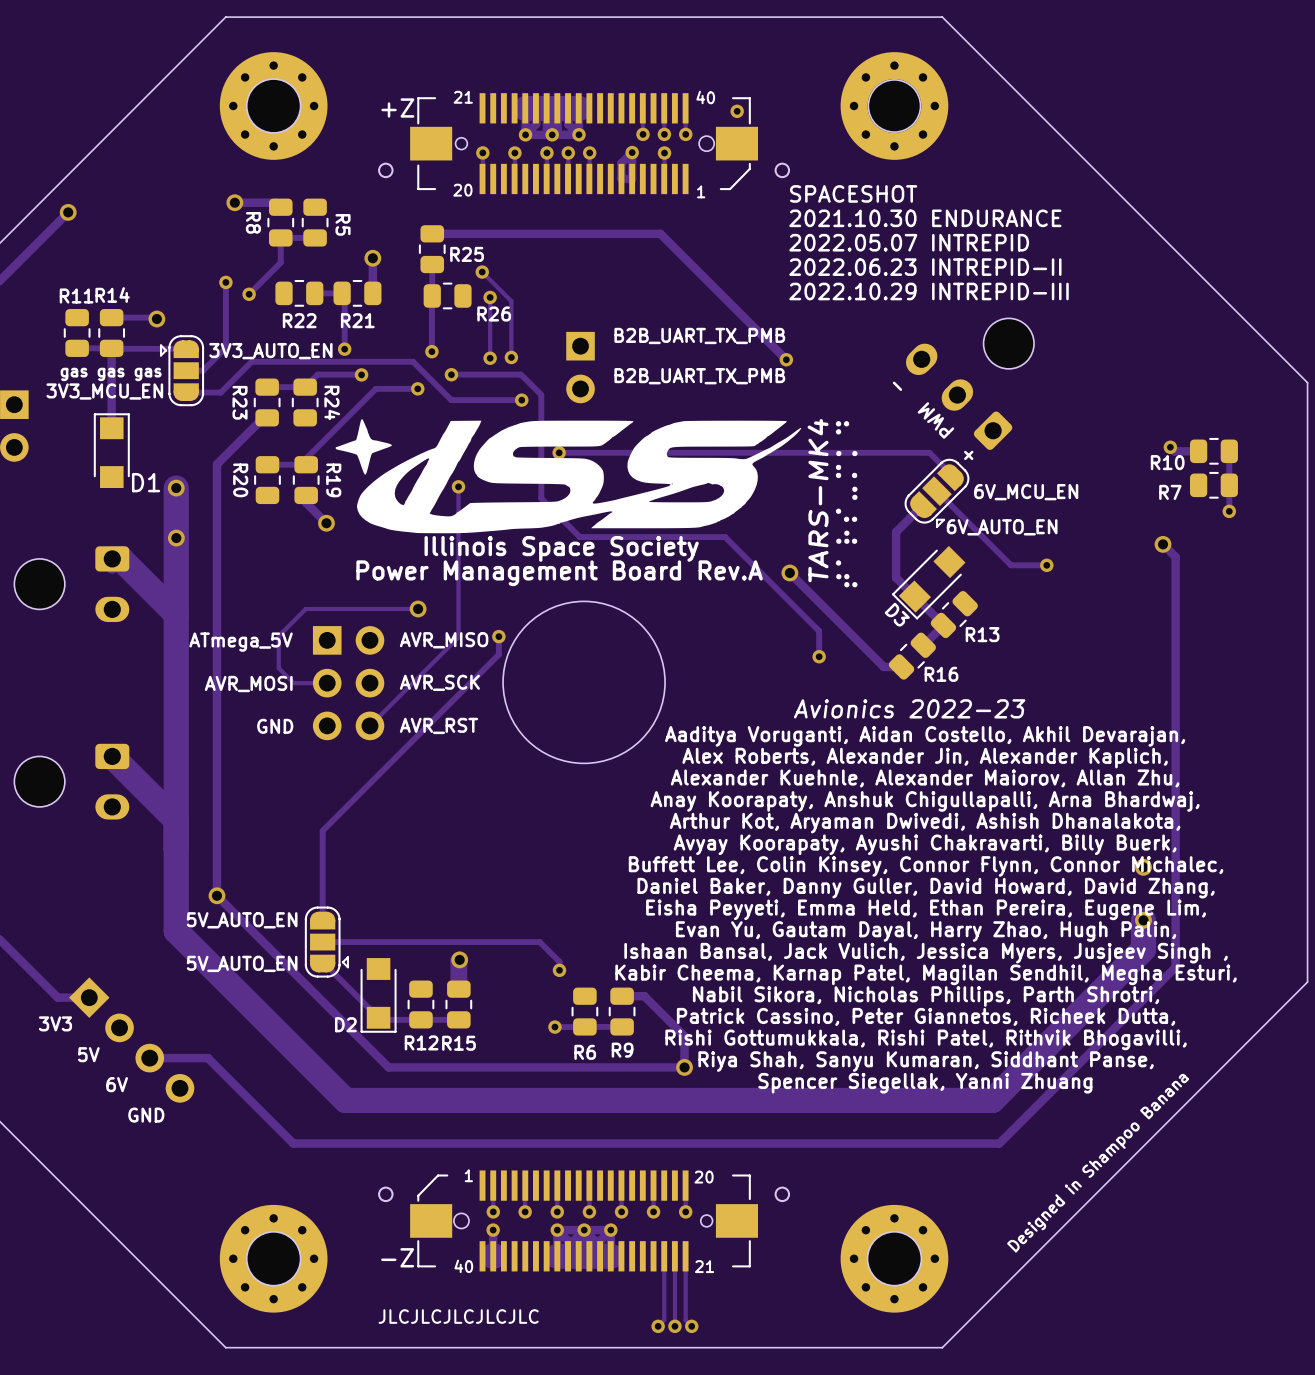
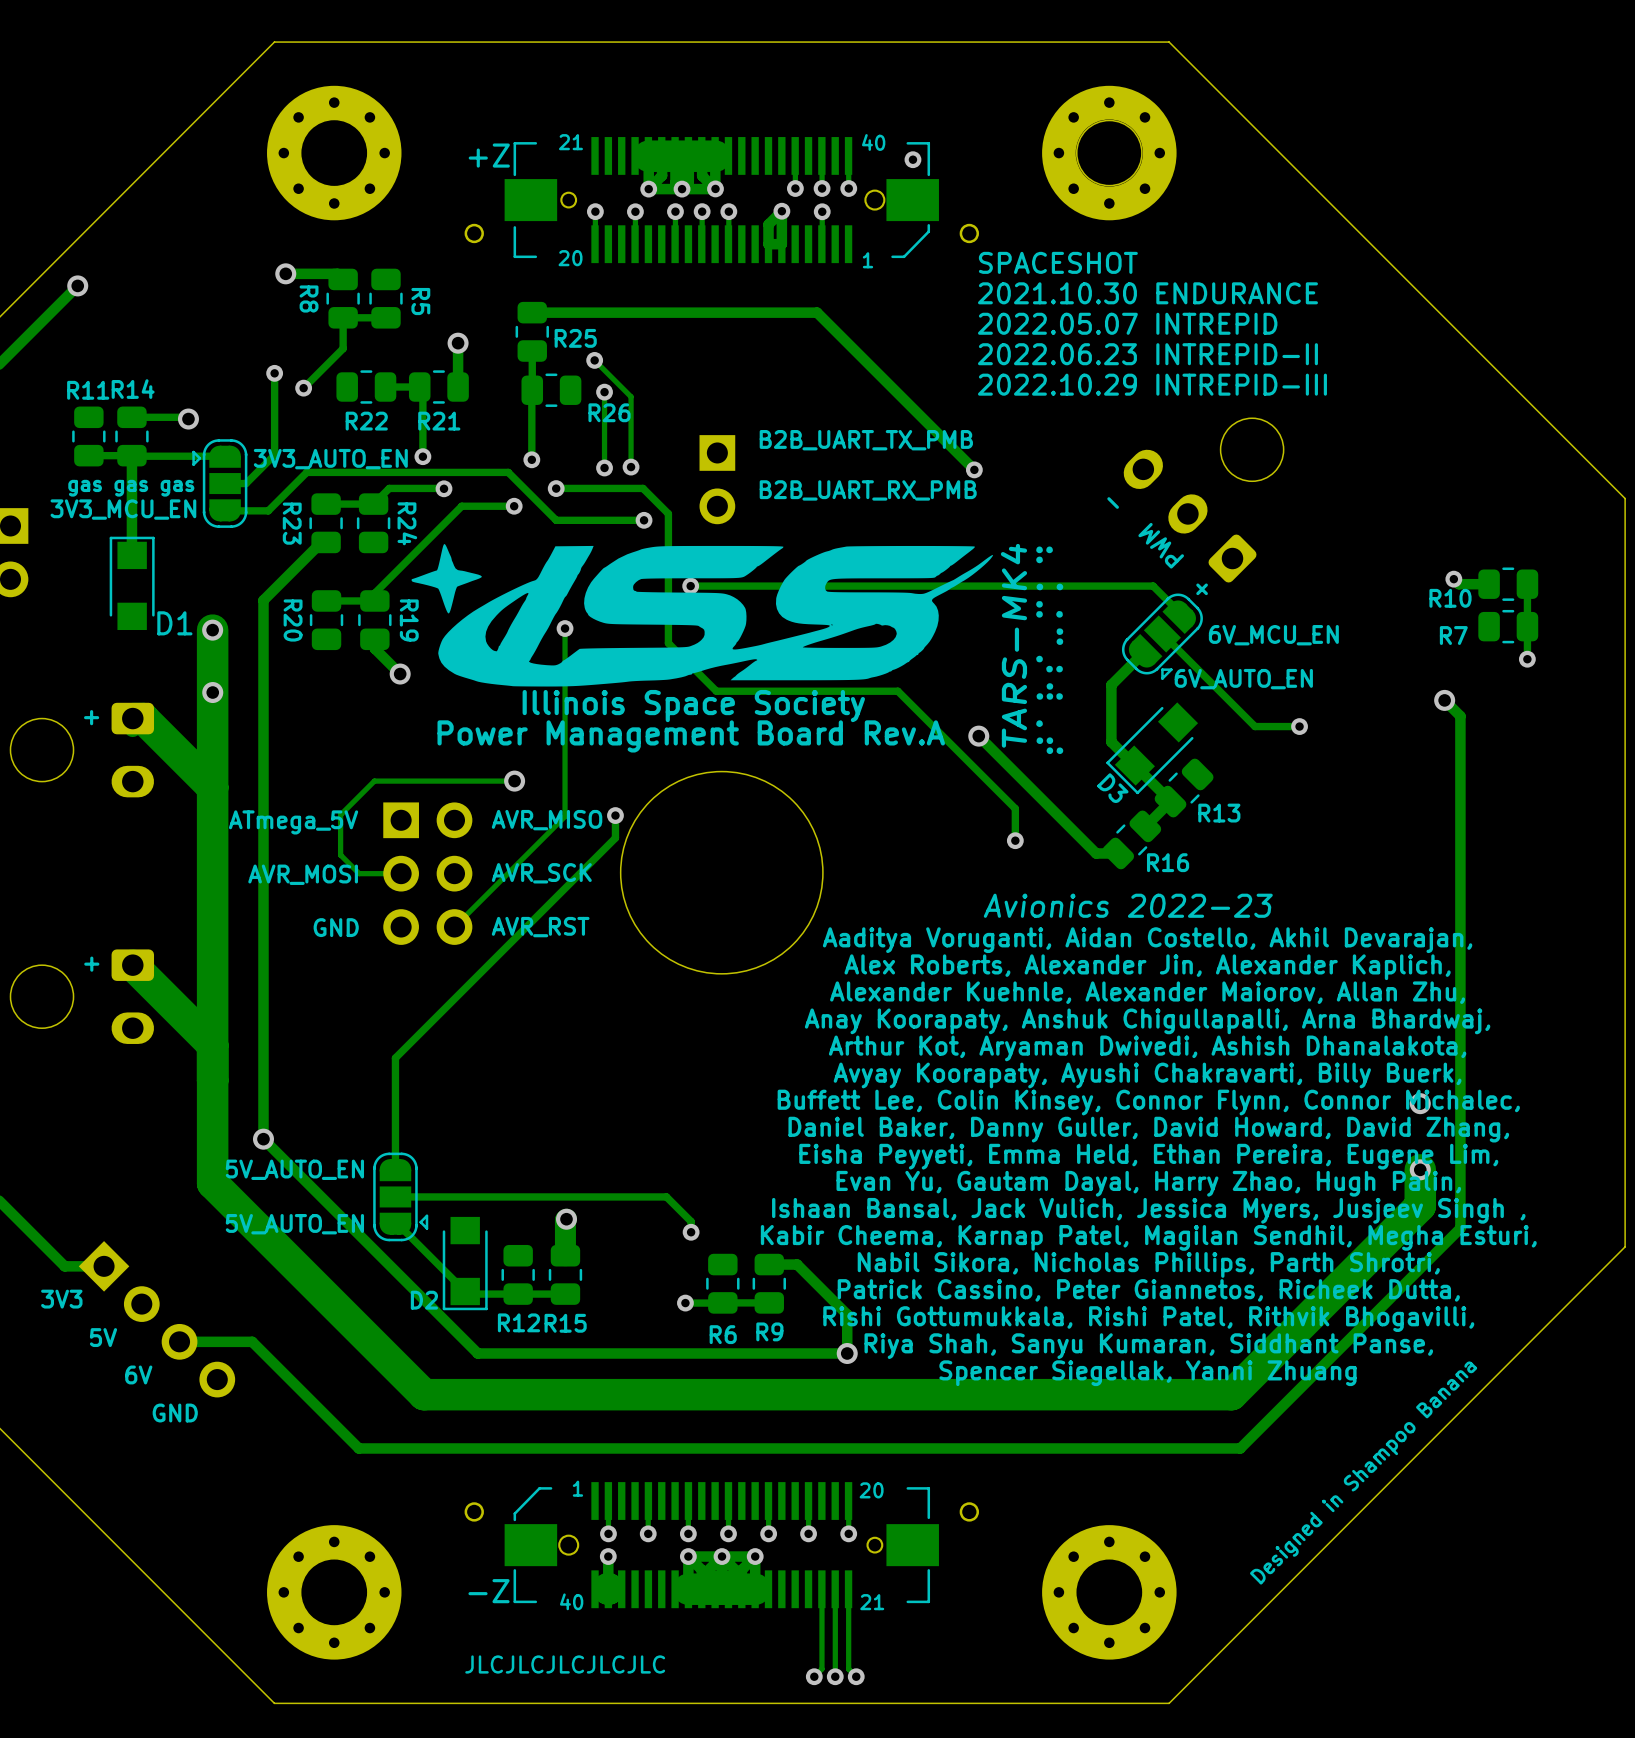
text: B2B_UART_TX_PMB (699, 376) -> B2B_UART_RX_PMB (868, 490)
text: none -> + (91, 717)
text: none -> + (91, 964)

